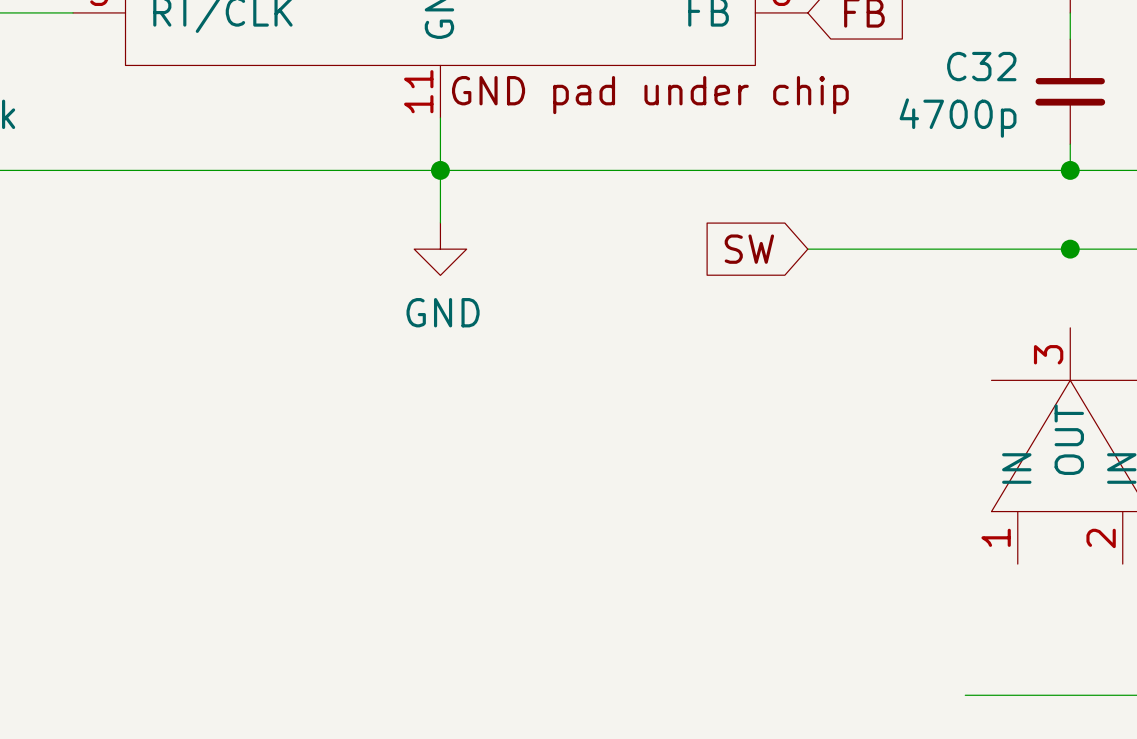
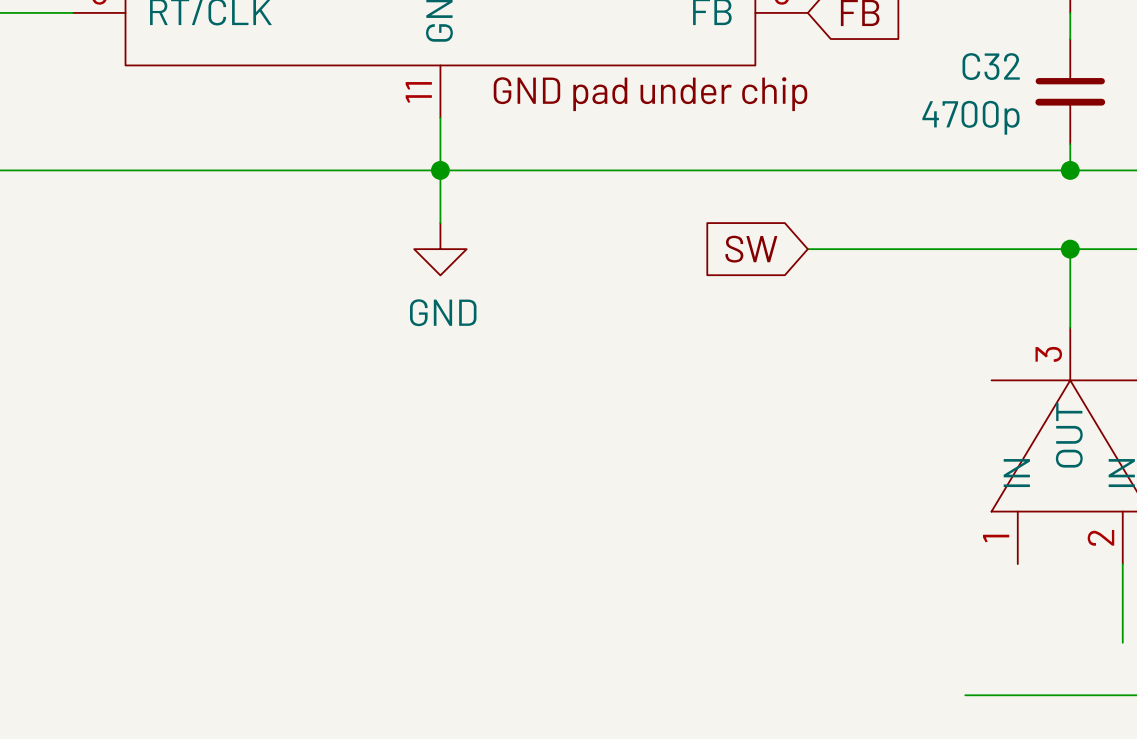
wire: none -> (1070, 249) (1070, 327)
wire: none -> (1122, 564) (1122, 642)

